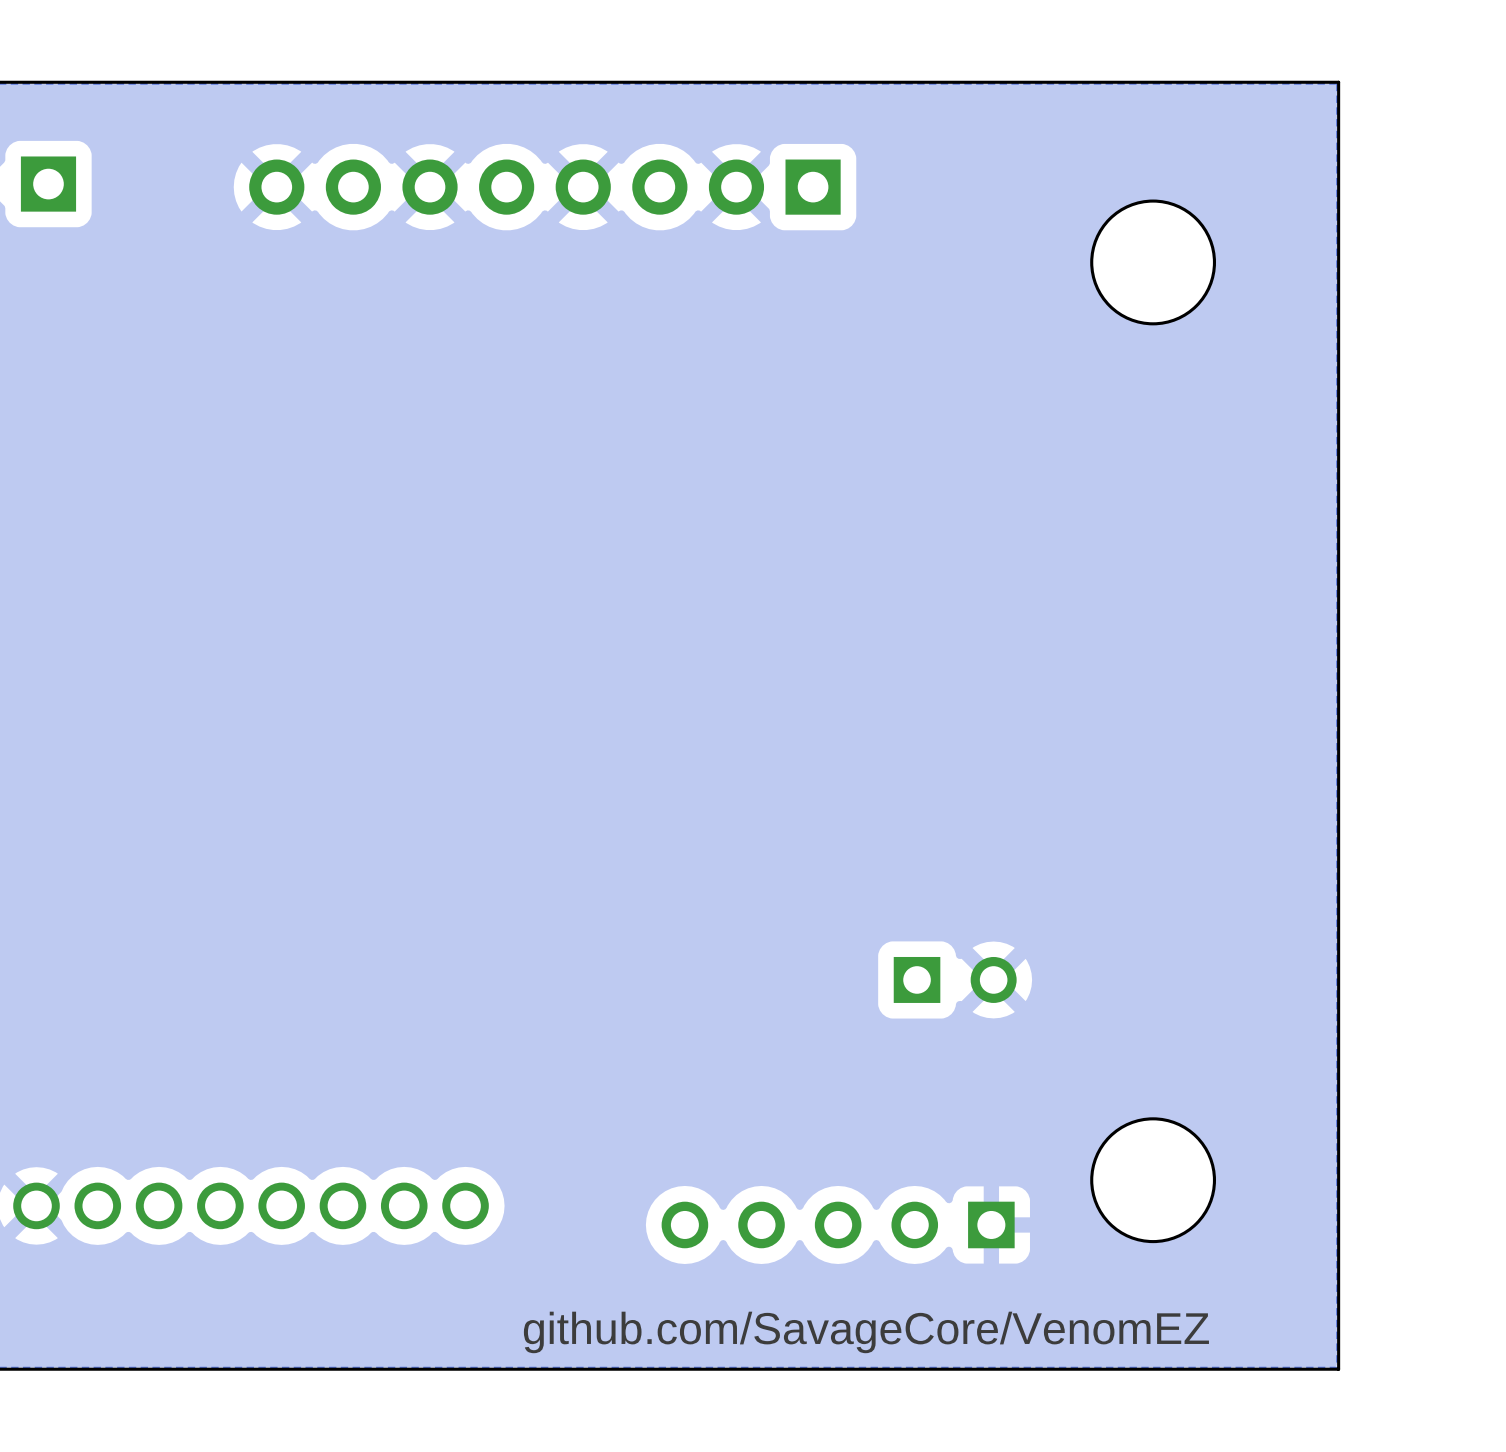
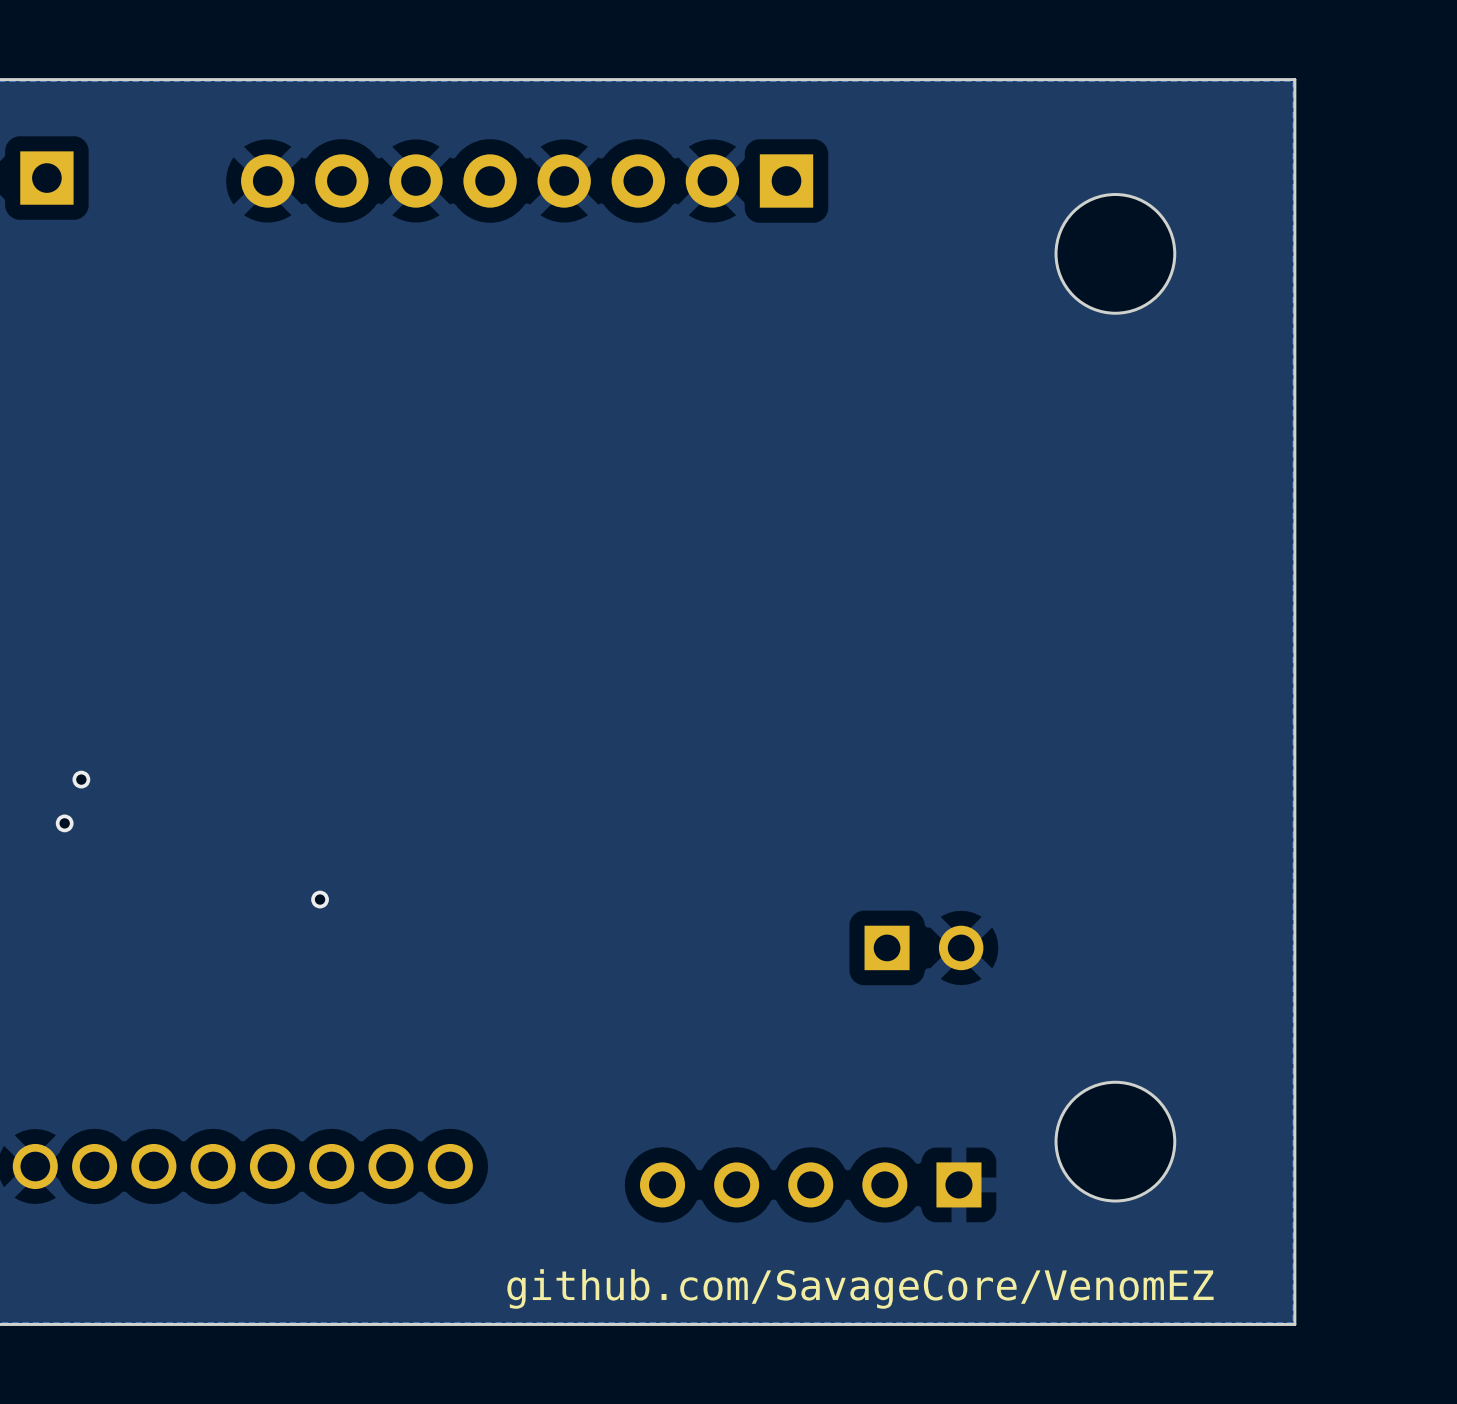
via: none -> (81, 779)
via: none -> (64, 823)
via: none -> (320, 899)

